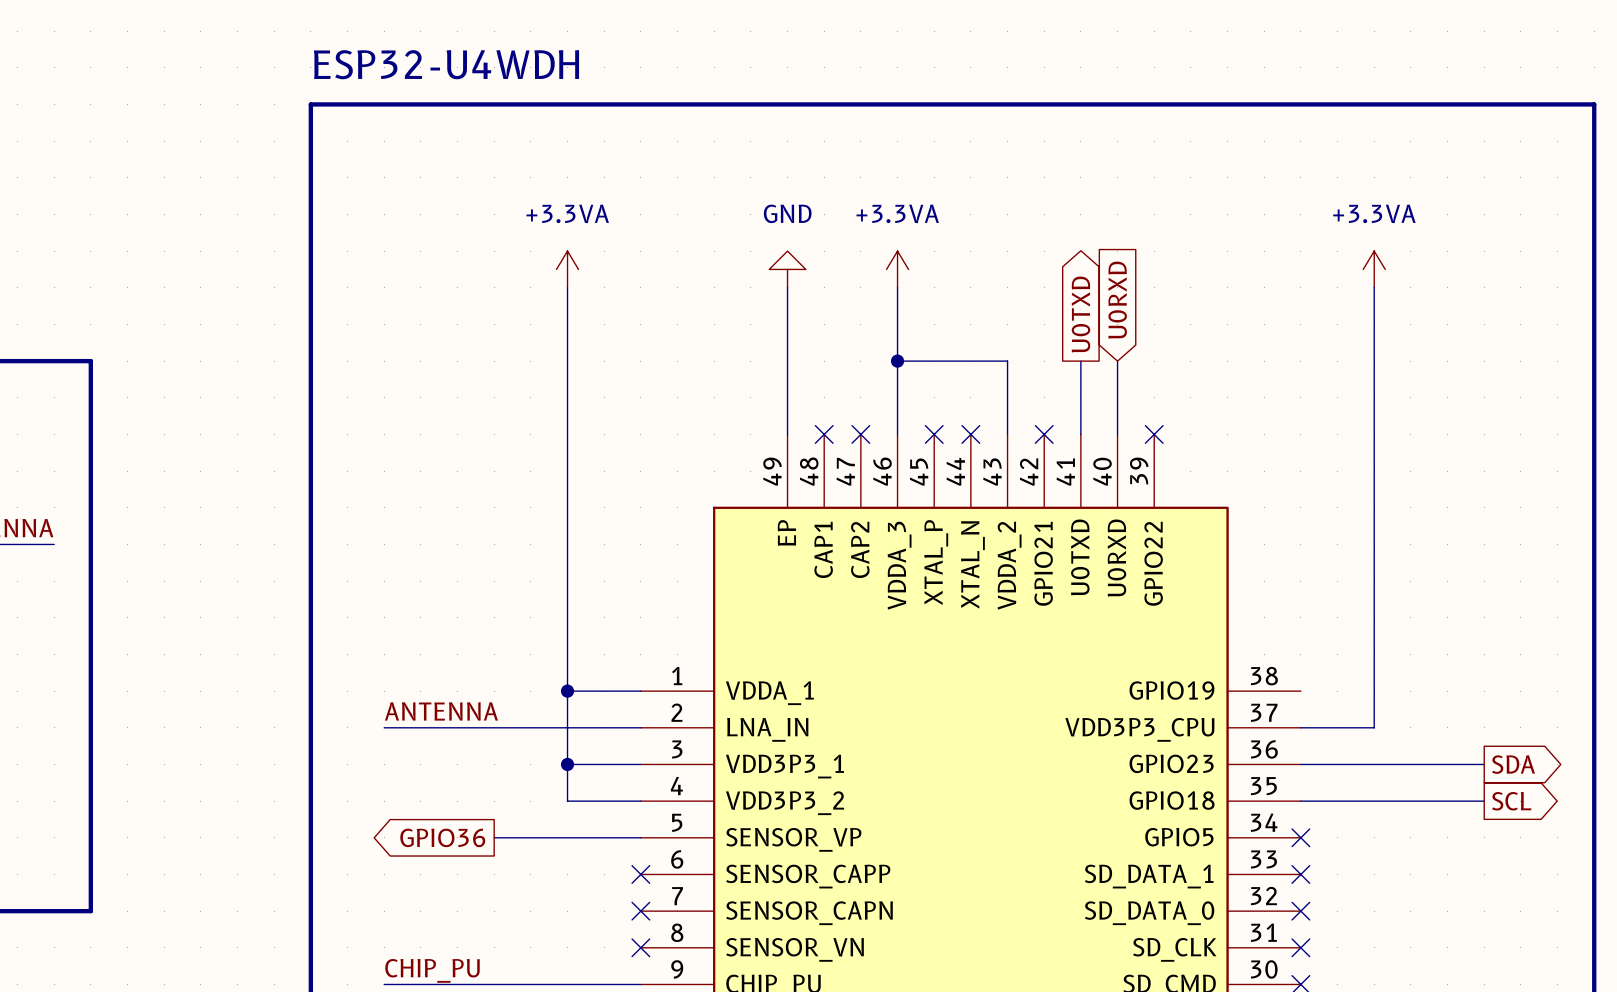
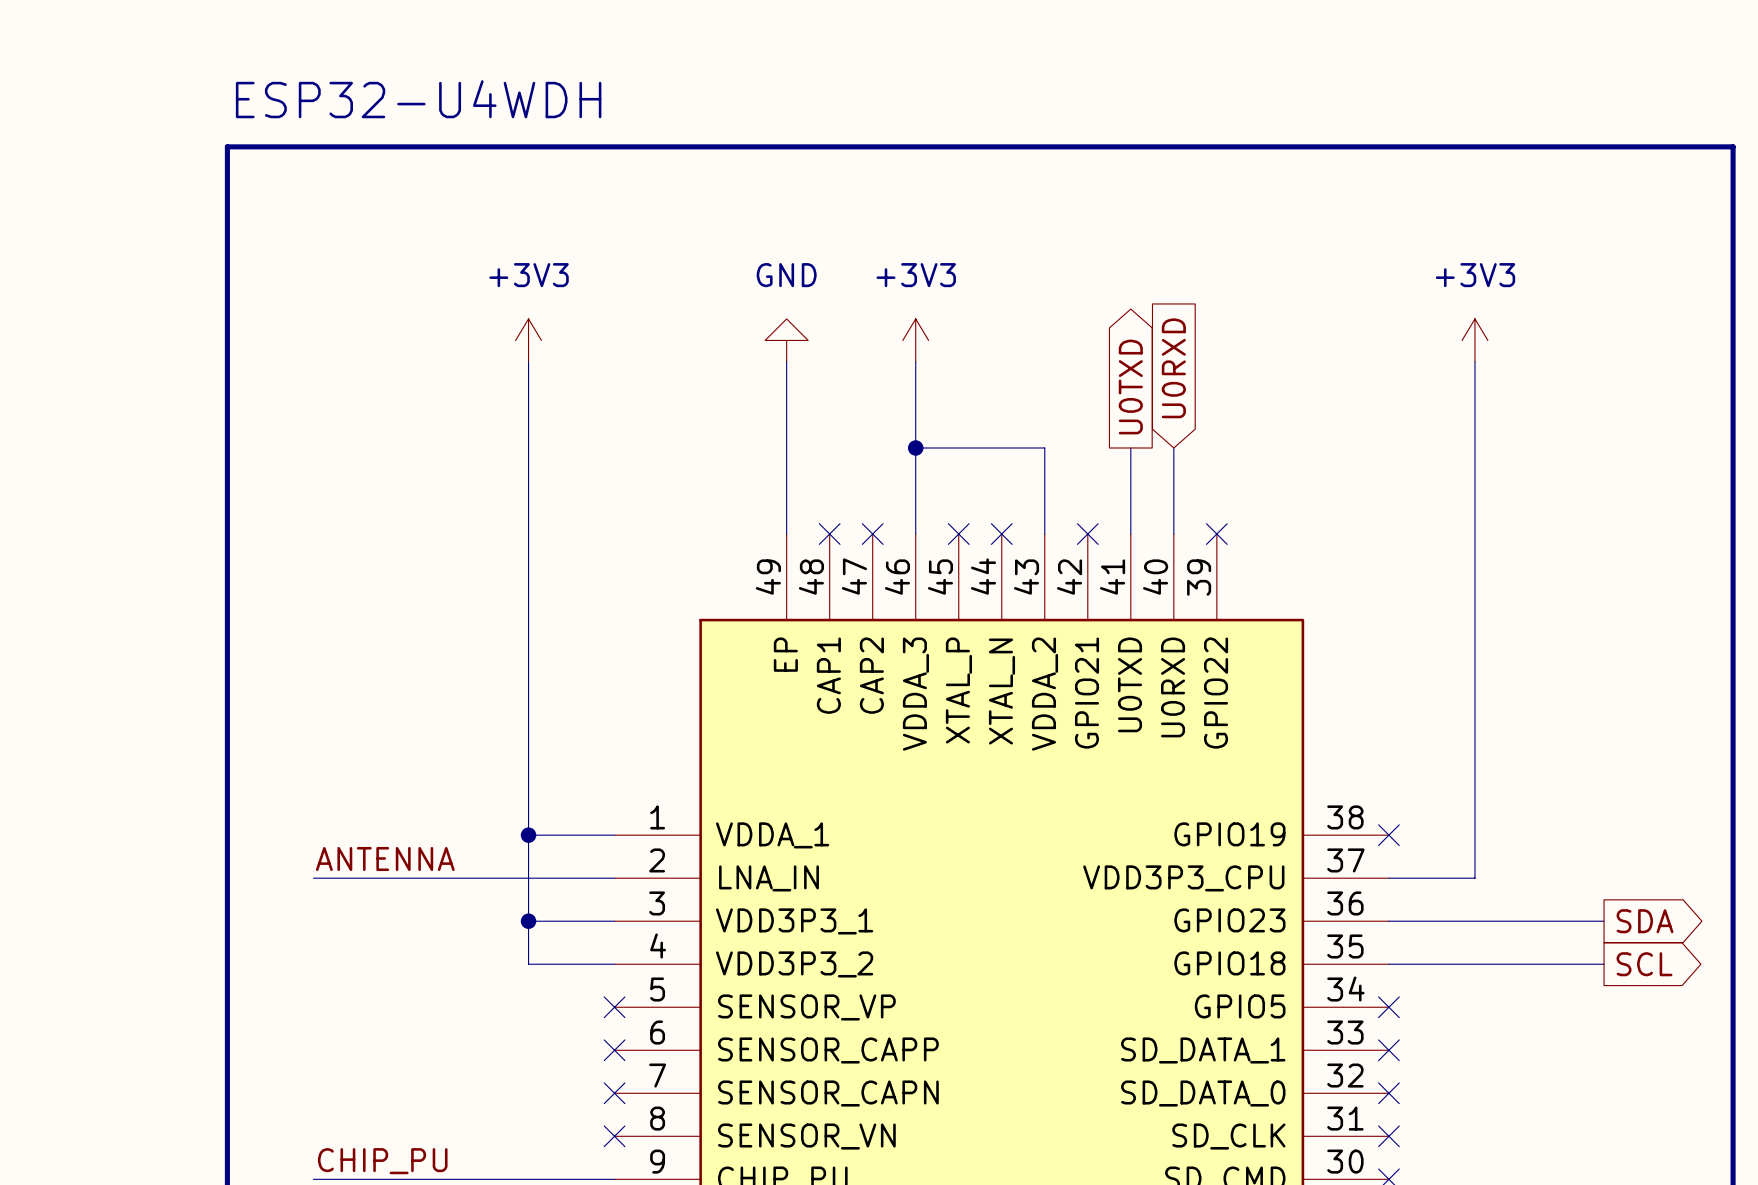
power symbol: +3.3VA (567, 269) -> +3V3 (528, 340)
power symbol: +3.3VA (897, 269) -> +3V3 (915, 340)
power symbol: +3.3VA (1374, 269) -> +3V3 (1474, 340)
no-connect mark: none -> (1388, 835)
global label: GPIO36 (442, 837) -> none
wire: (494, 837) (640, 837) -> none
no-connect mark: none -> (614, 1007)

